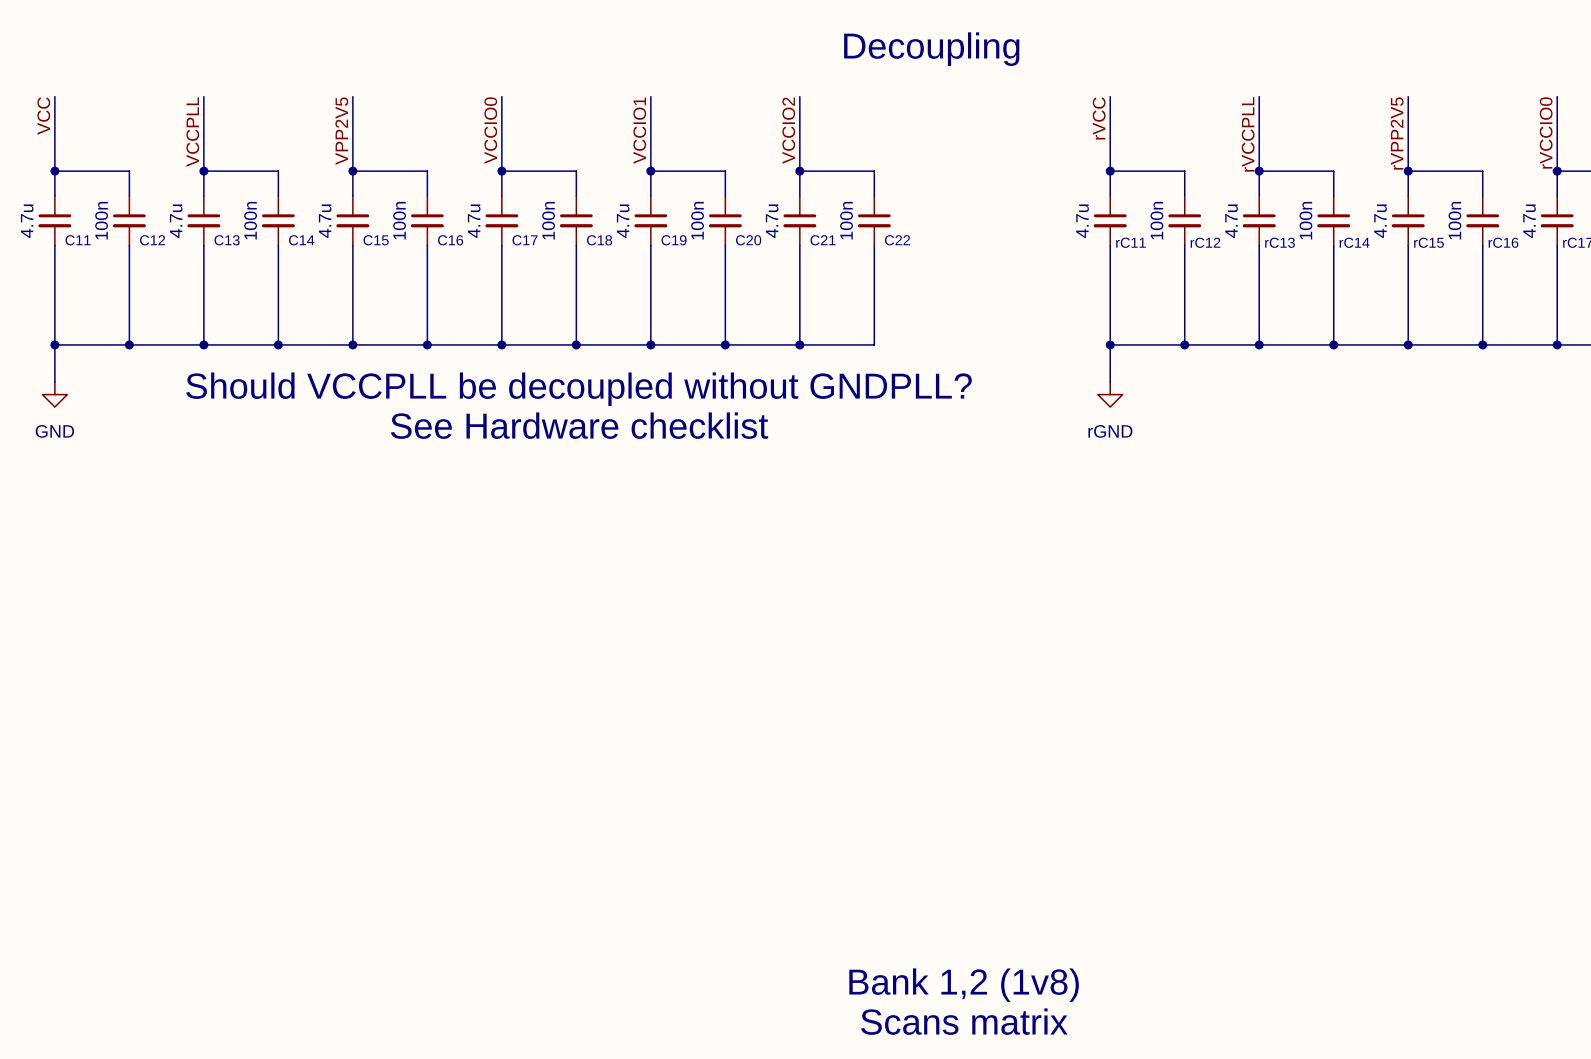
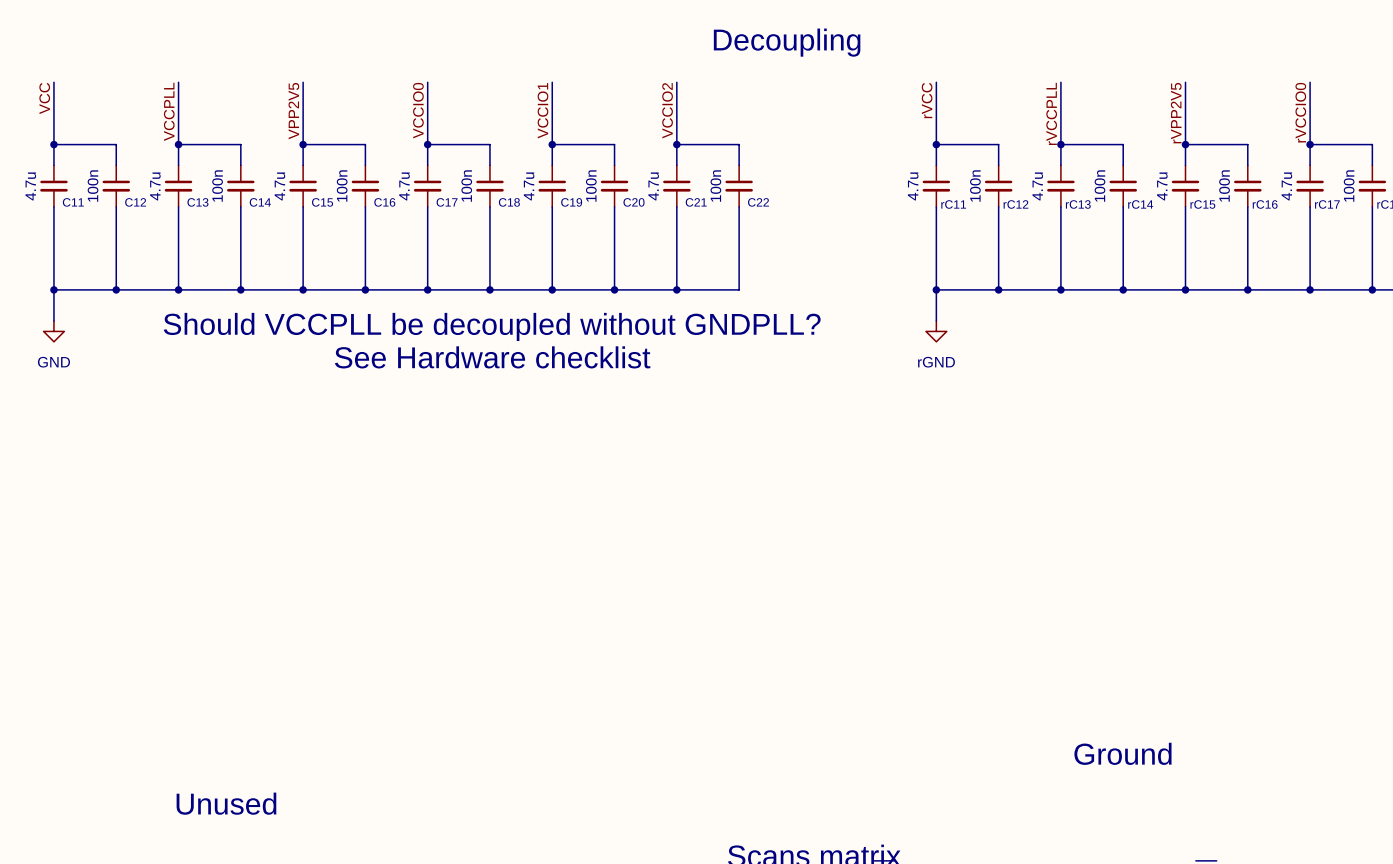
text: none -> Ground (1123, 753)
text: none -> Unused (226, 803)
text: Bank 1,2 (1v8) (964, 985) -> none
wire: none -> (874, 860) (894, 860)
wire: none -> (1195, 860) (1216, 860)

